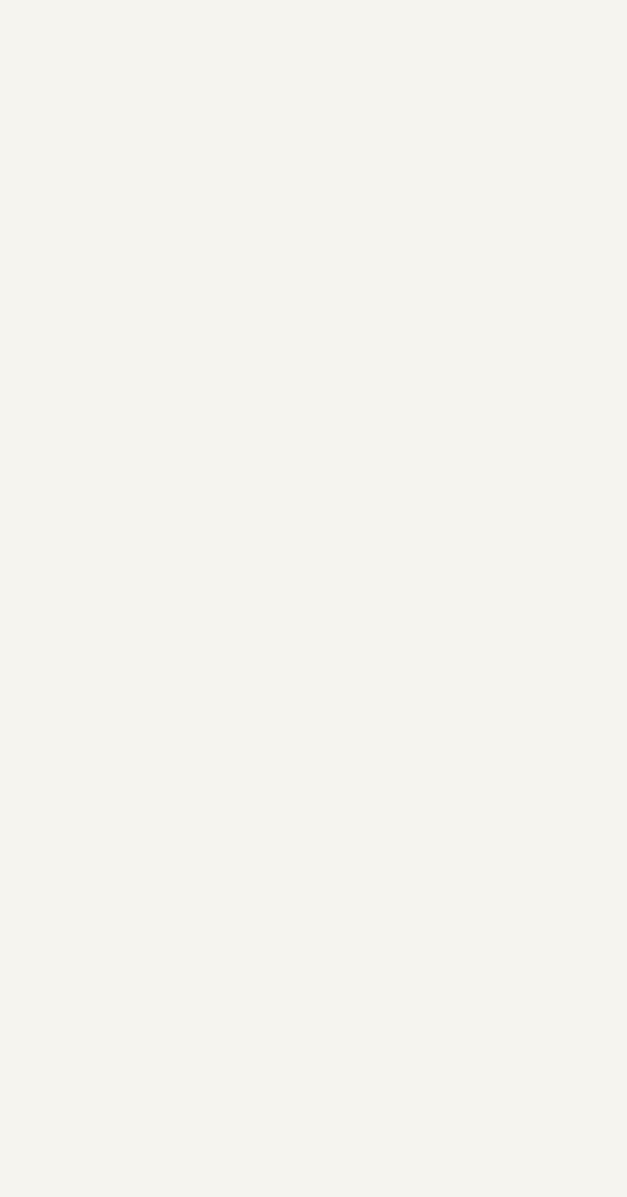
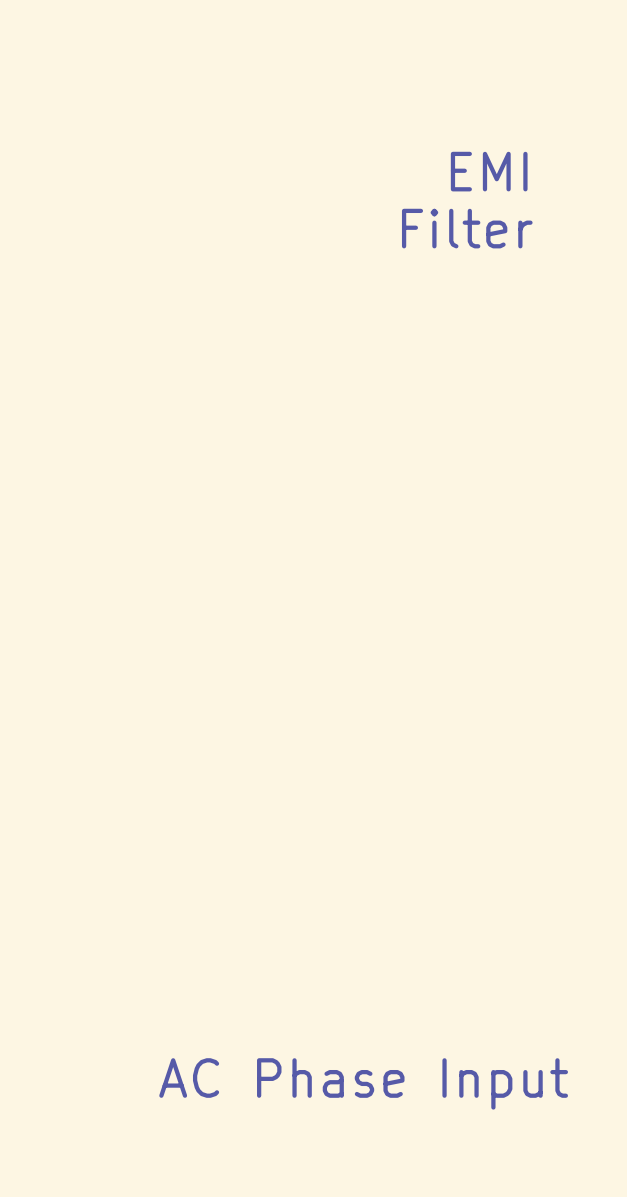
text: none -> EMI (489, 171)
text: none -> Filter (467, 228)
text: none -> AC Phase Input (363, 1083)

